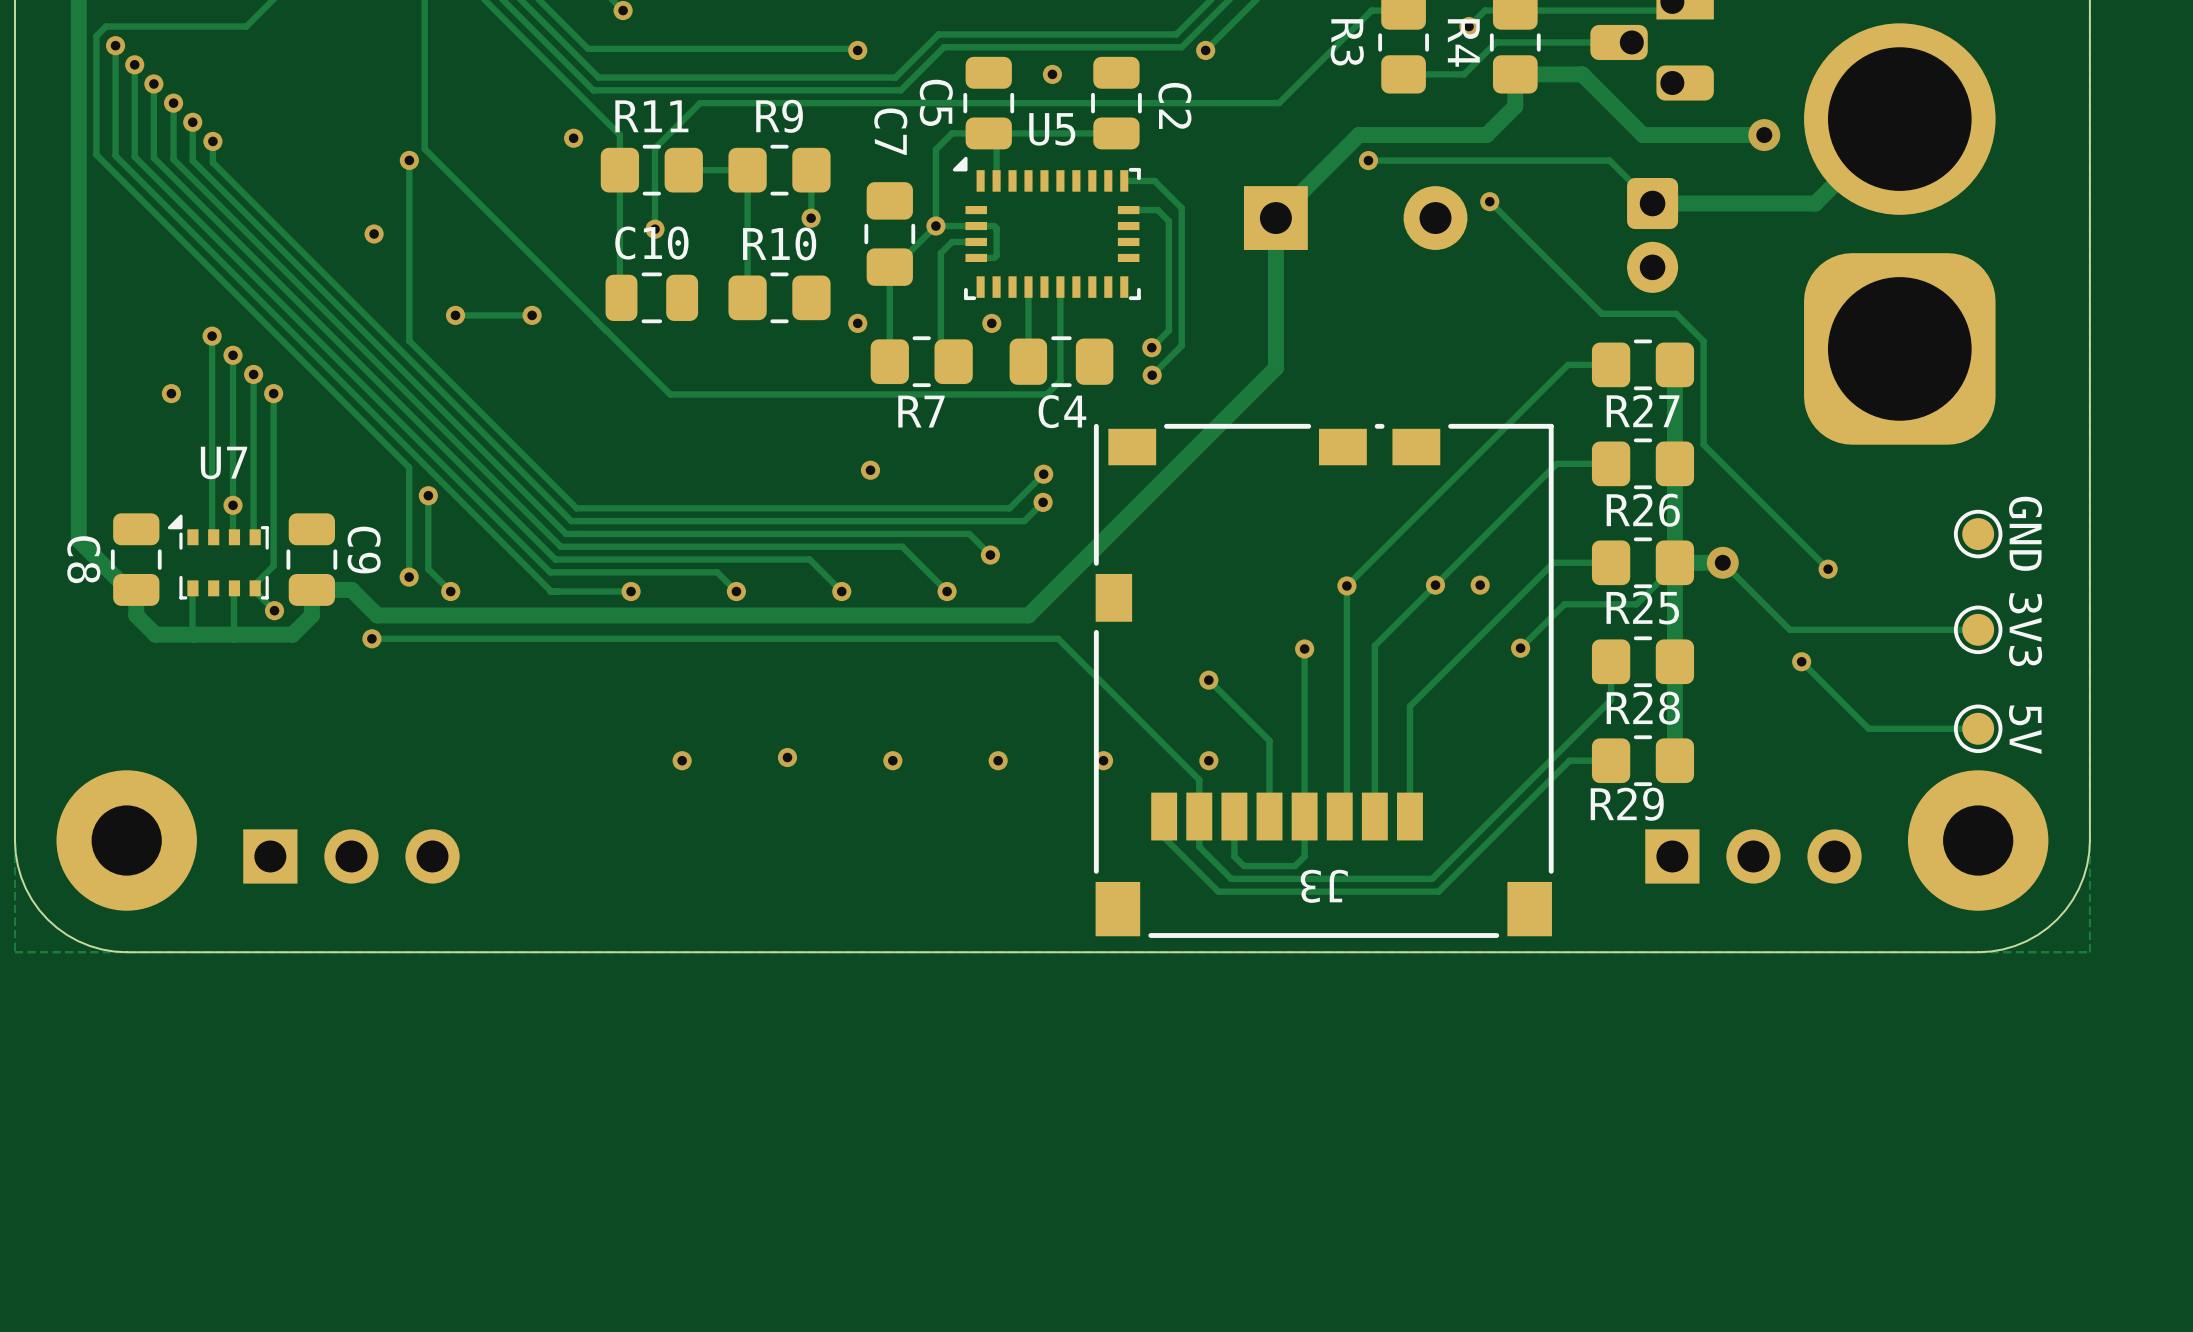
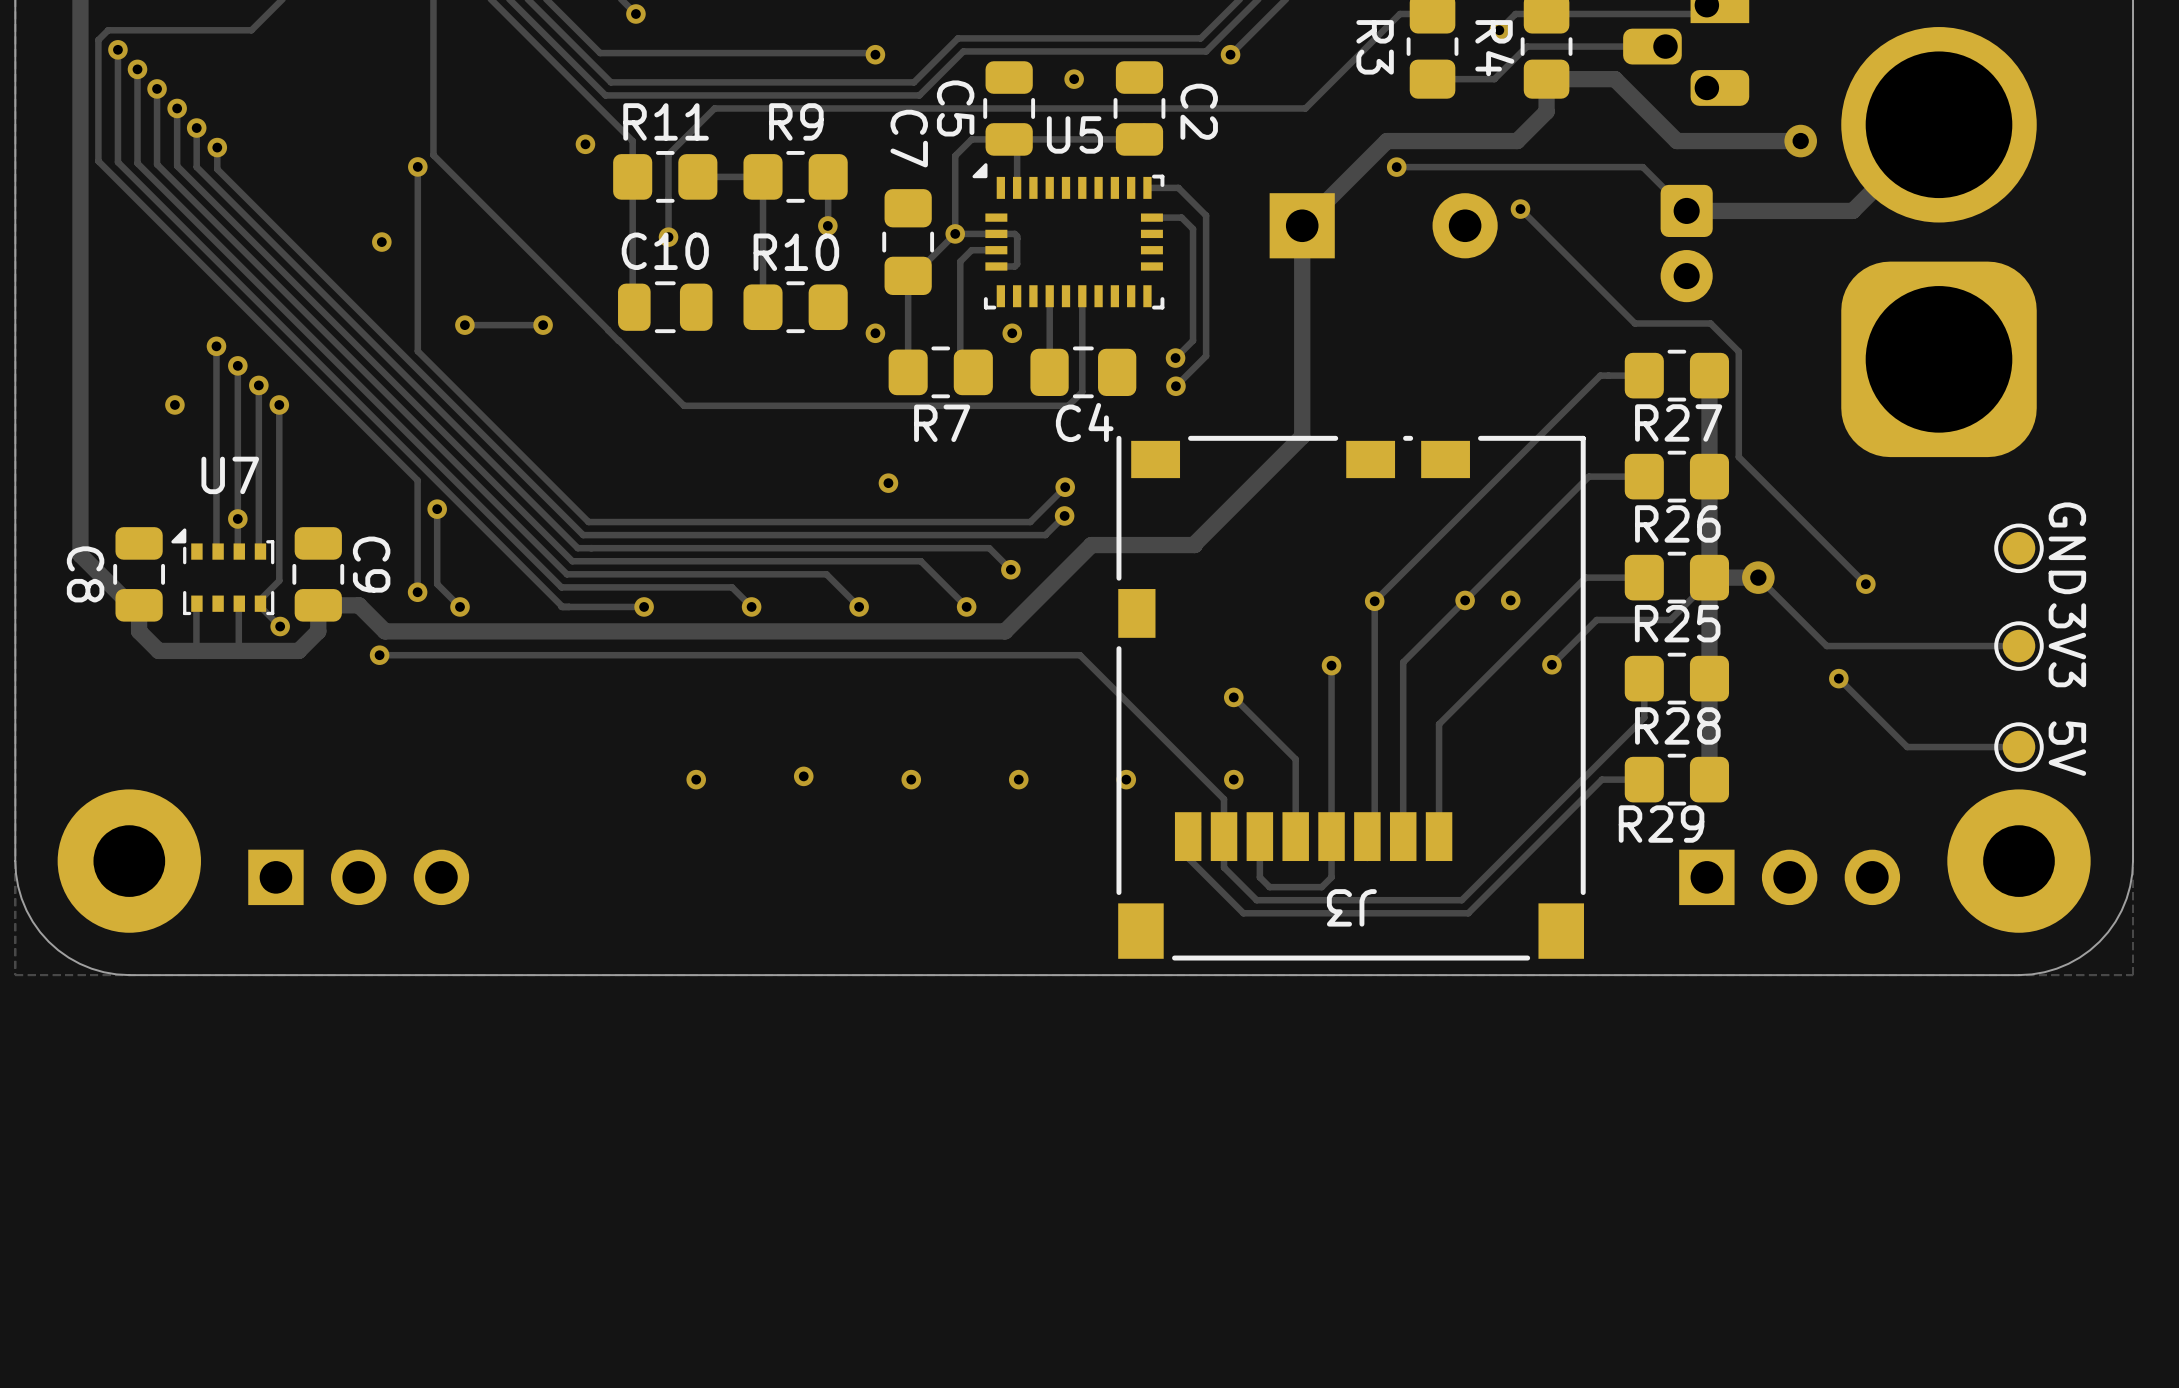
track: (1275, 368) (1028, 615) (984, 615) -> (1302, 378) (1302, 436) (1194, 545) (1091, 545) (1005, 631)

